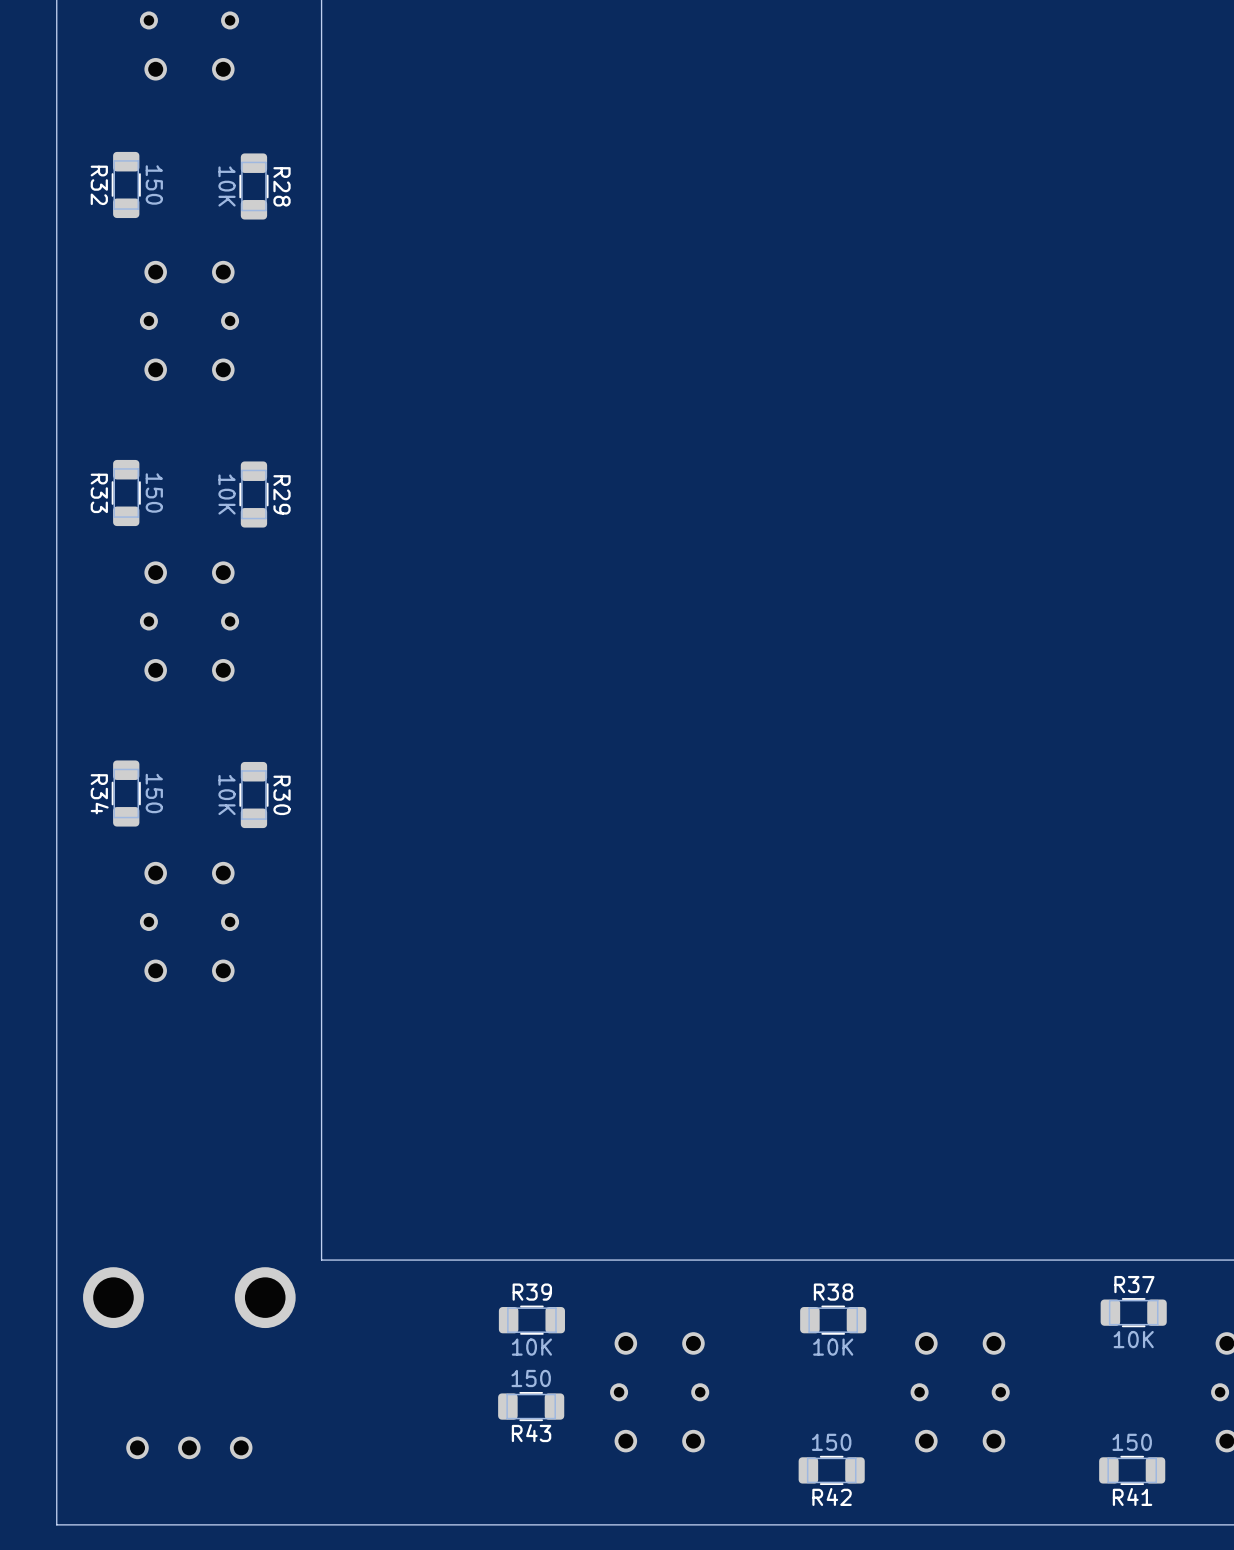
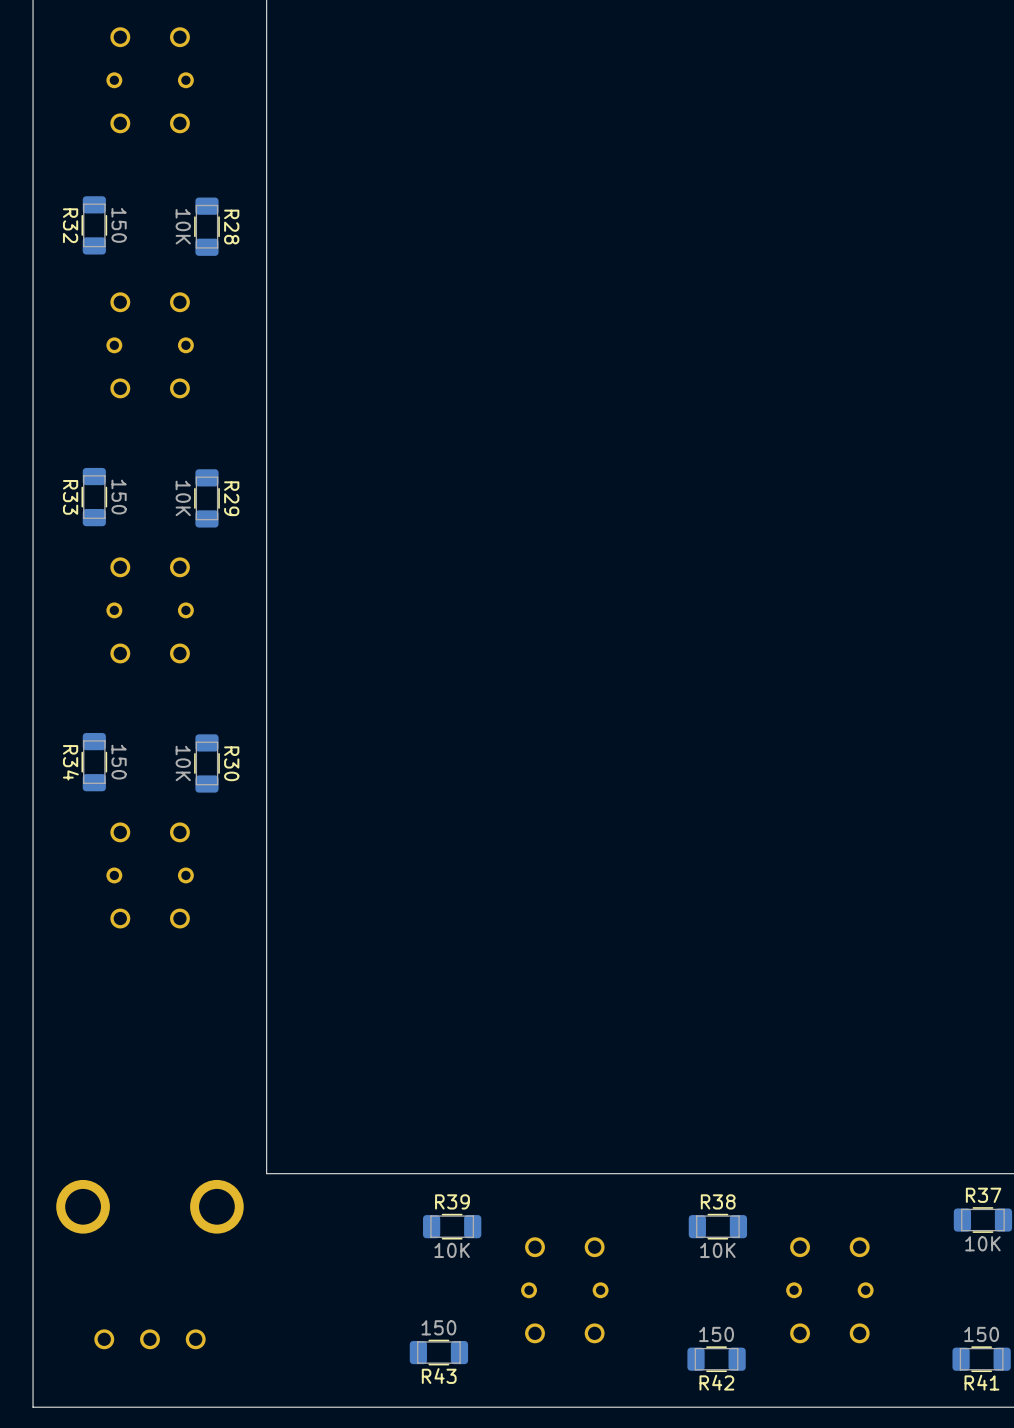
R43 position: (531, 1406) -> (438, 1352)

